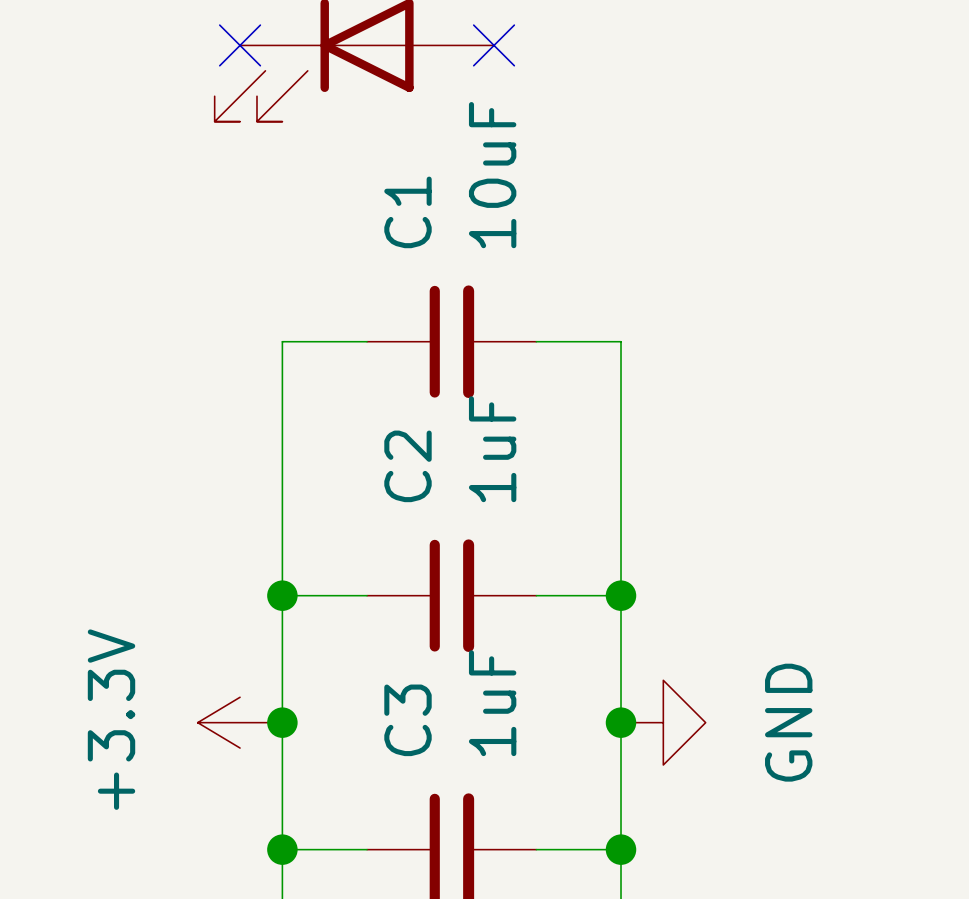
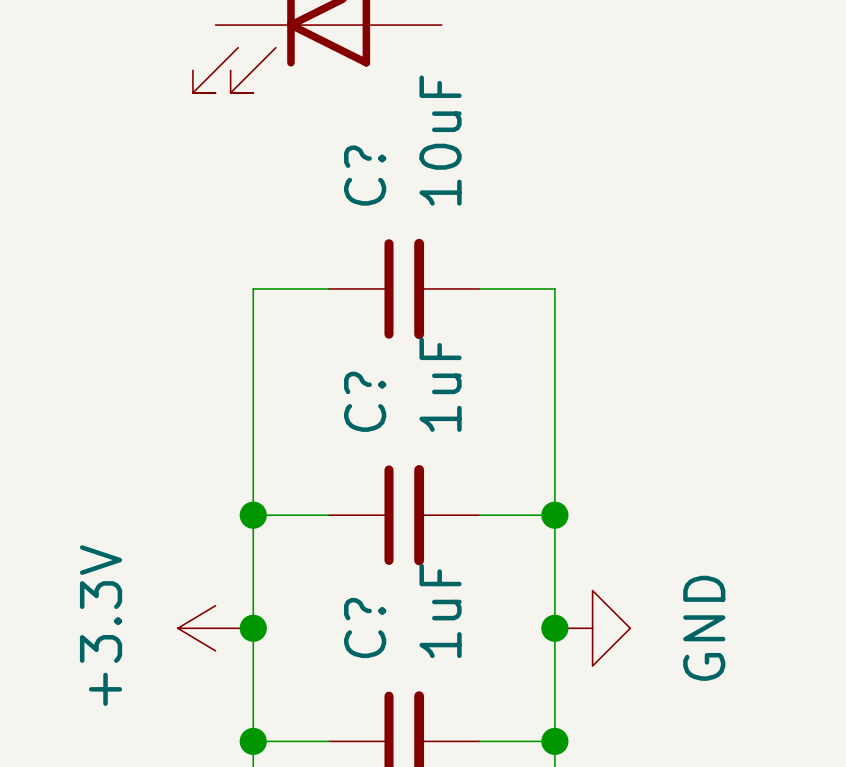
no-connect mark: (240, 45) -> none
no-connect mark: (494, 45) -> none
C1 name: C1 (407, 212) -> C? (365, 175)
C2 name: C2 (407, 466) -> C? (365, 401)
C3 name: C3 (407, 720) -> C? (365, 628)

